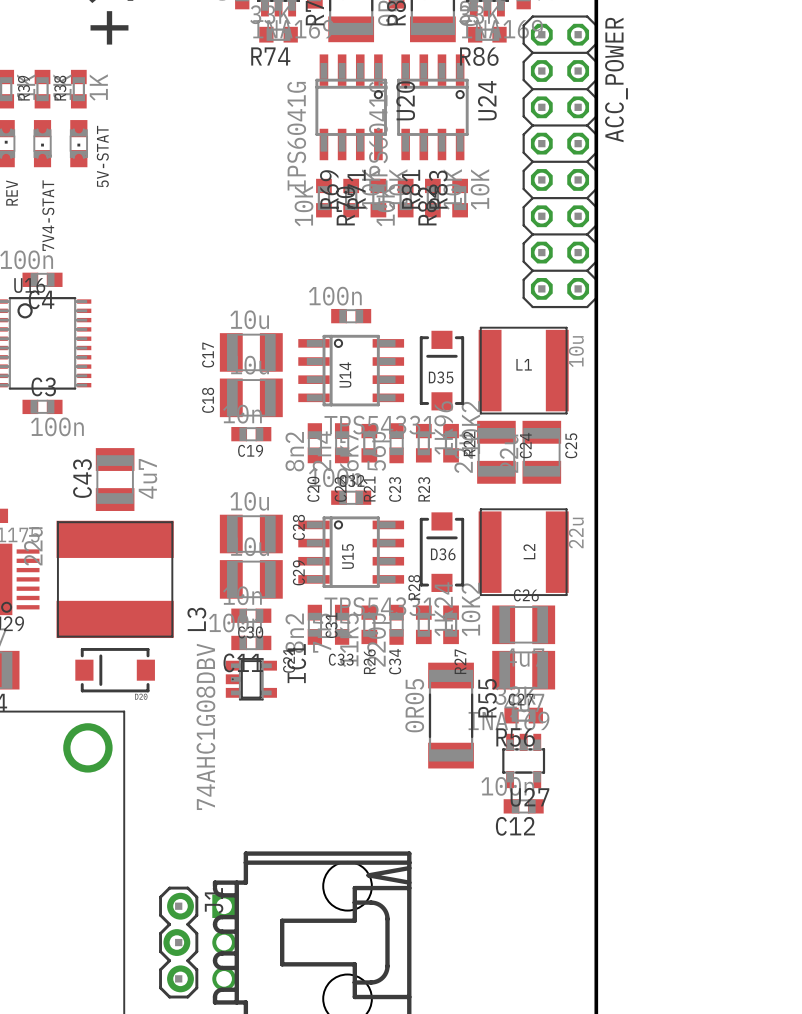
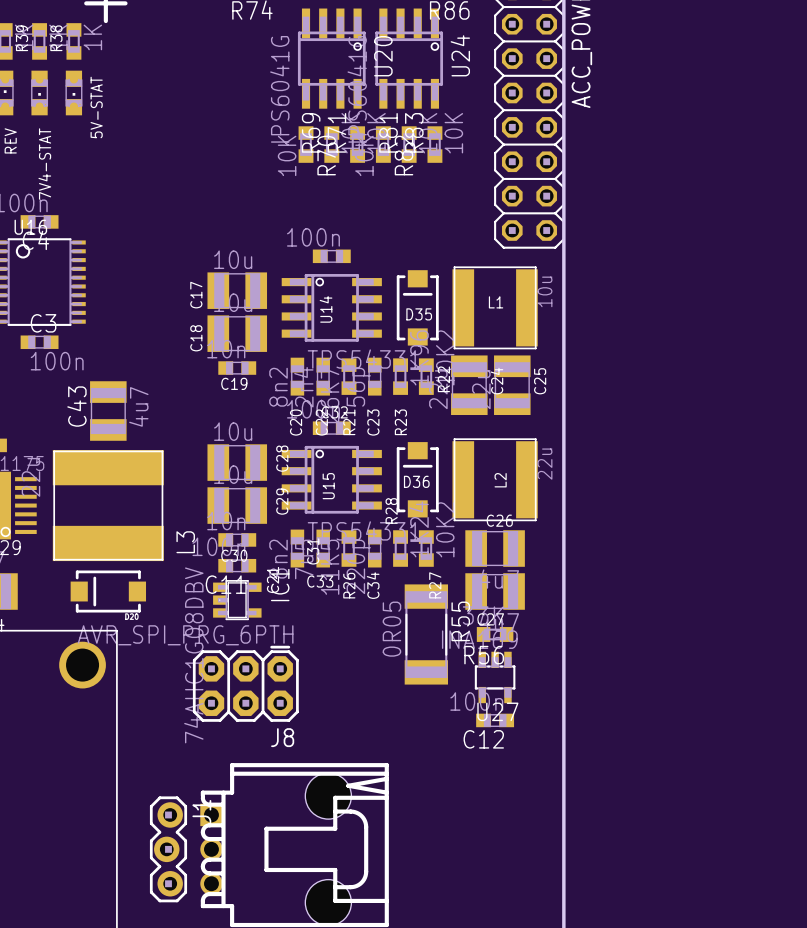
J8: none -> AVR_SPI_PRG_6PTH (245, 683)

